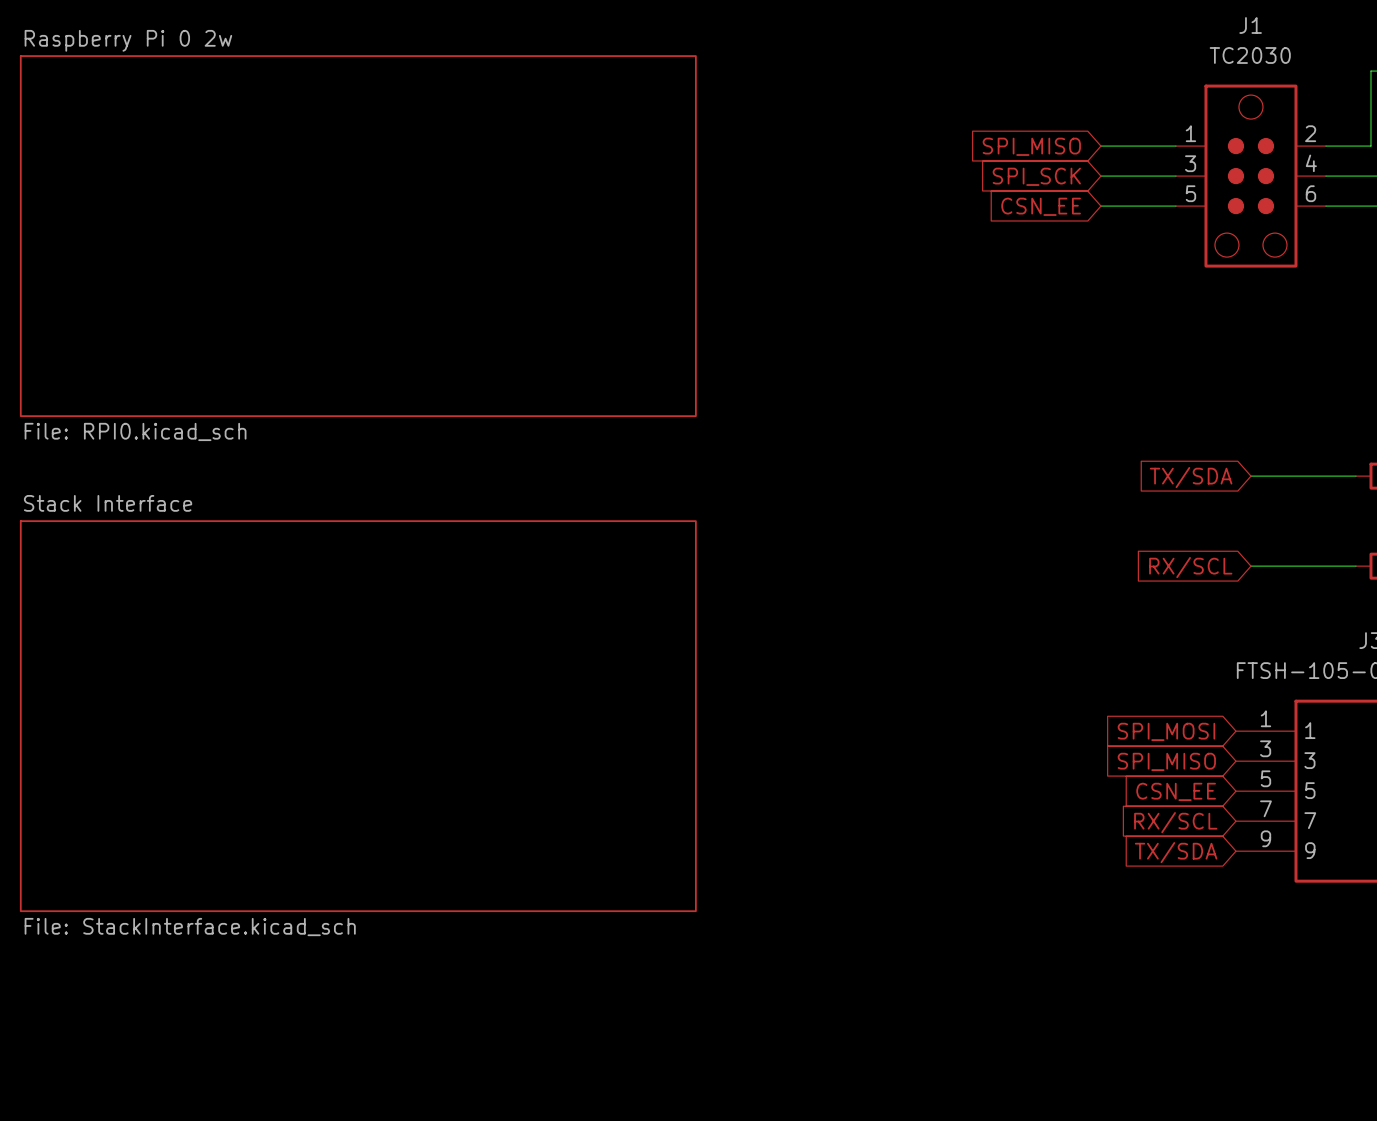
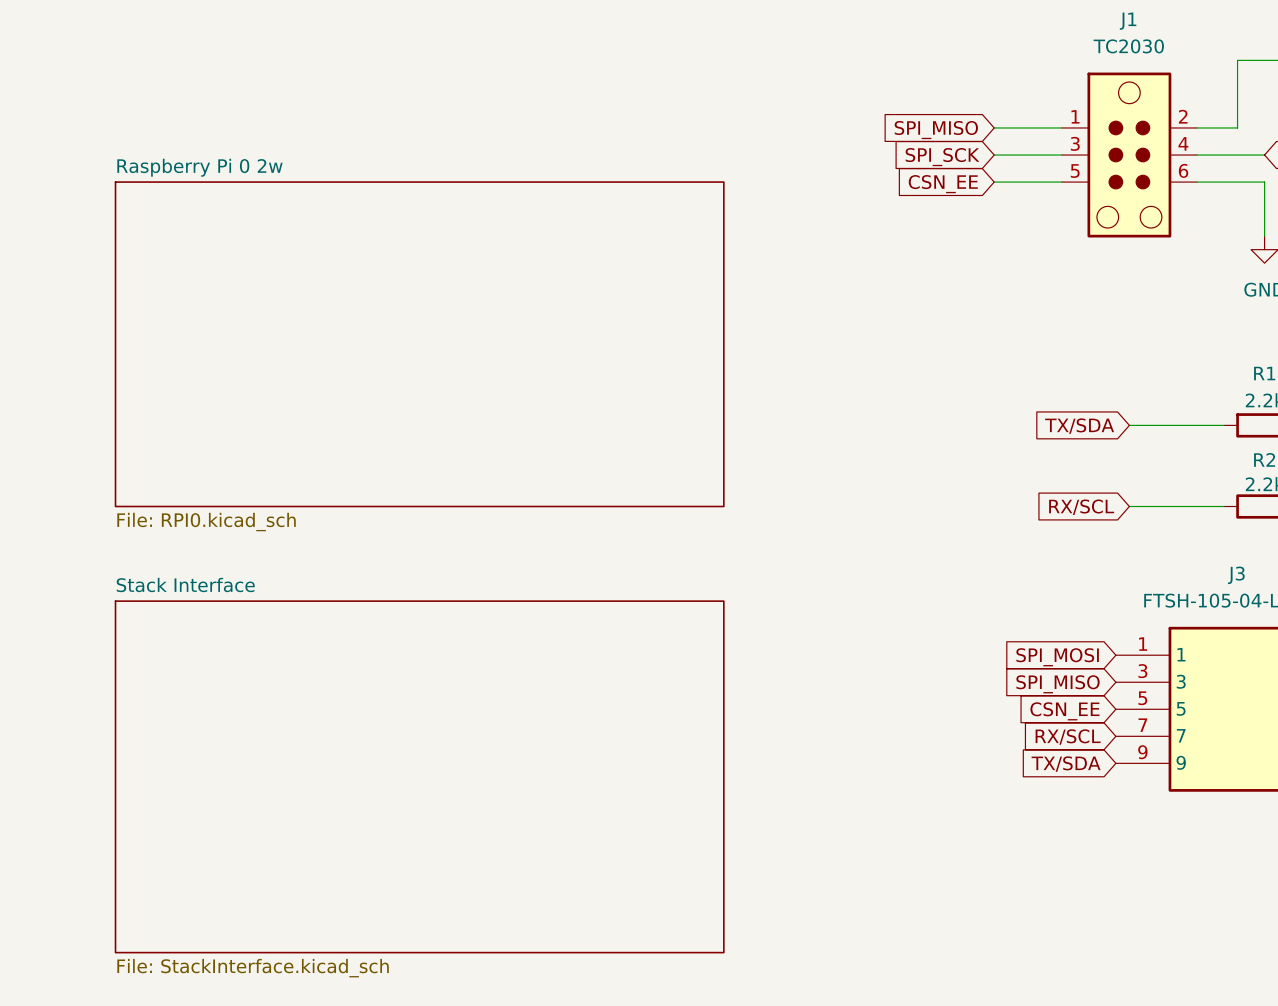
sheet Raspberry Pi 0 2w position: (358, 236) -> (419, 344)
sheet Stack Interface position: (358, 716) -> (419, 776)

